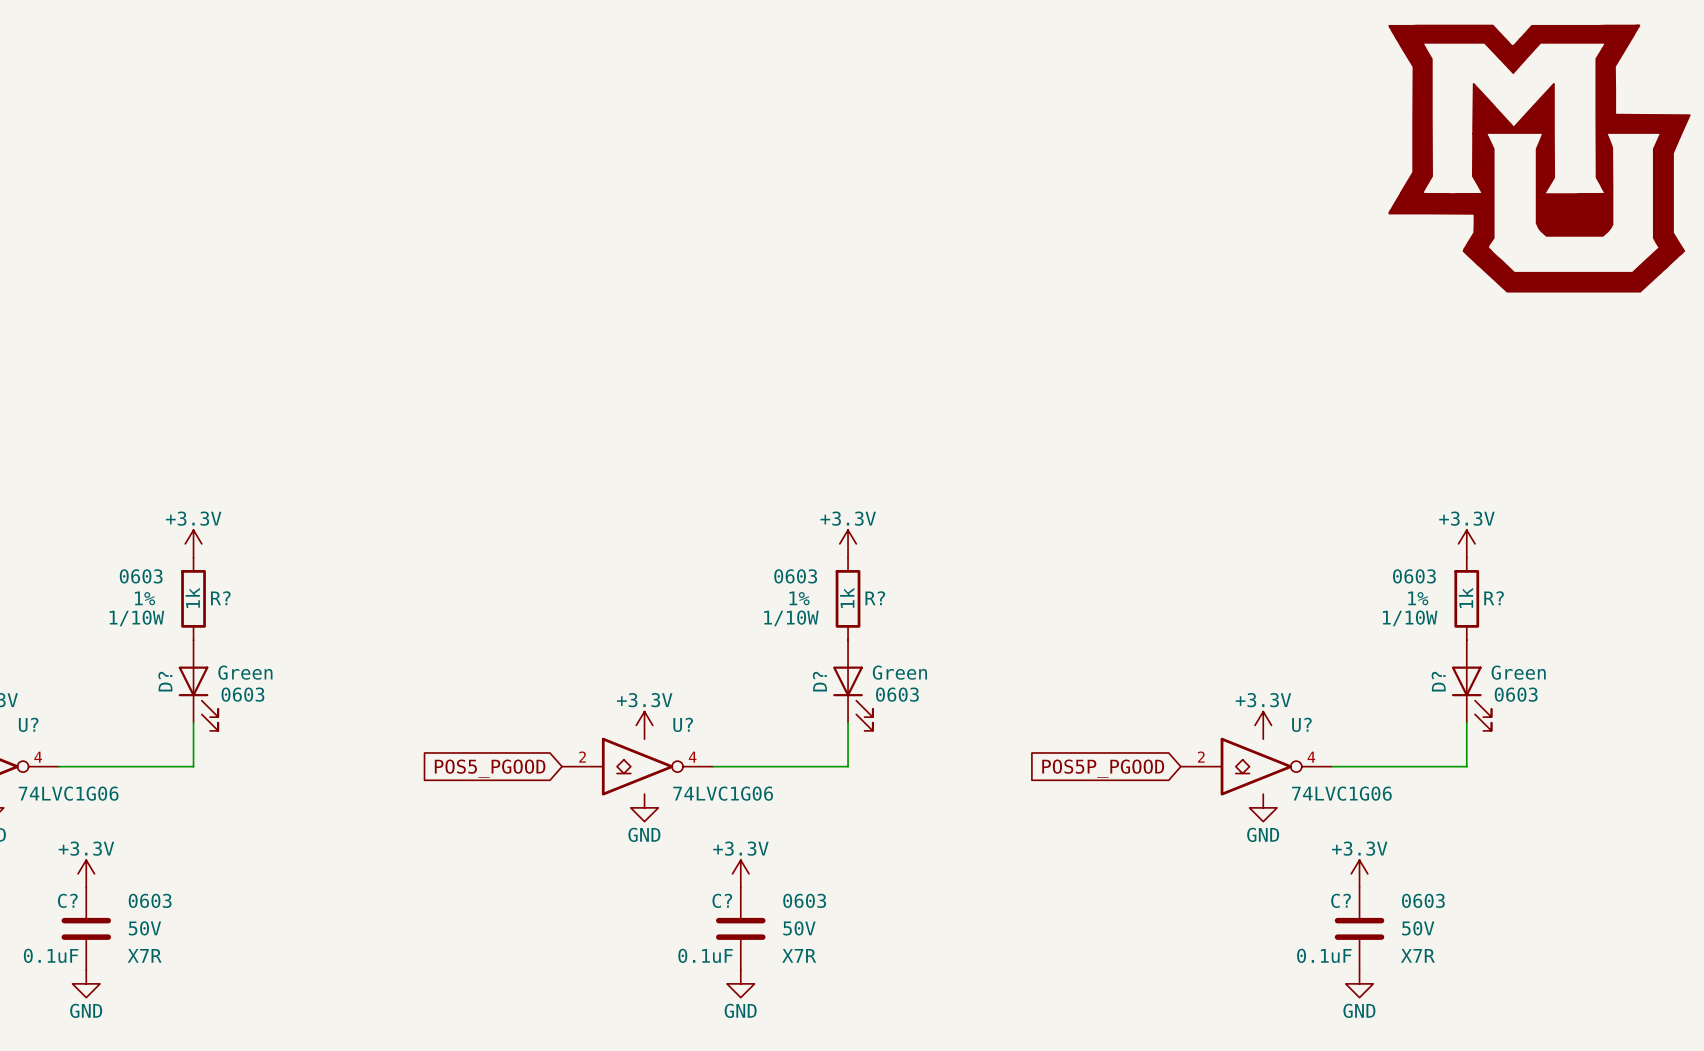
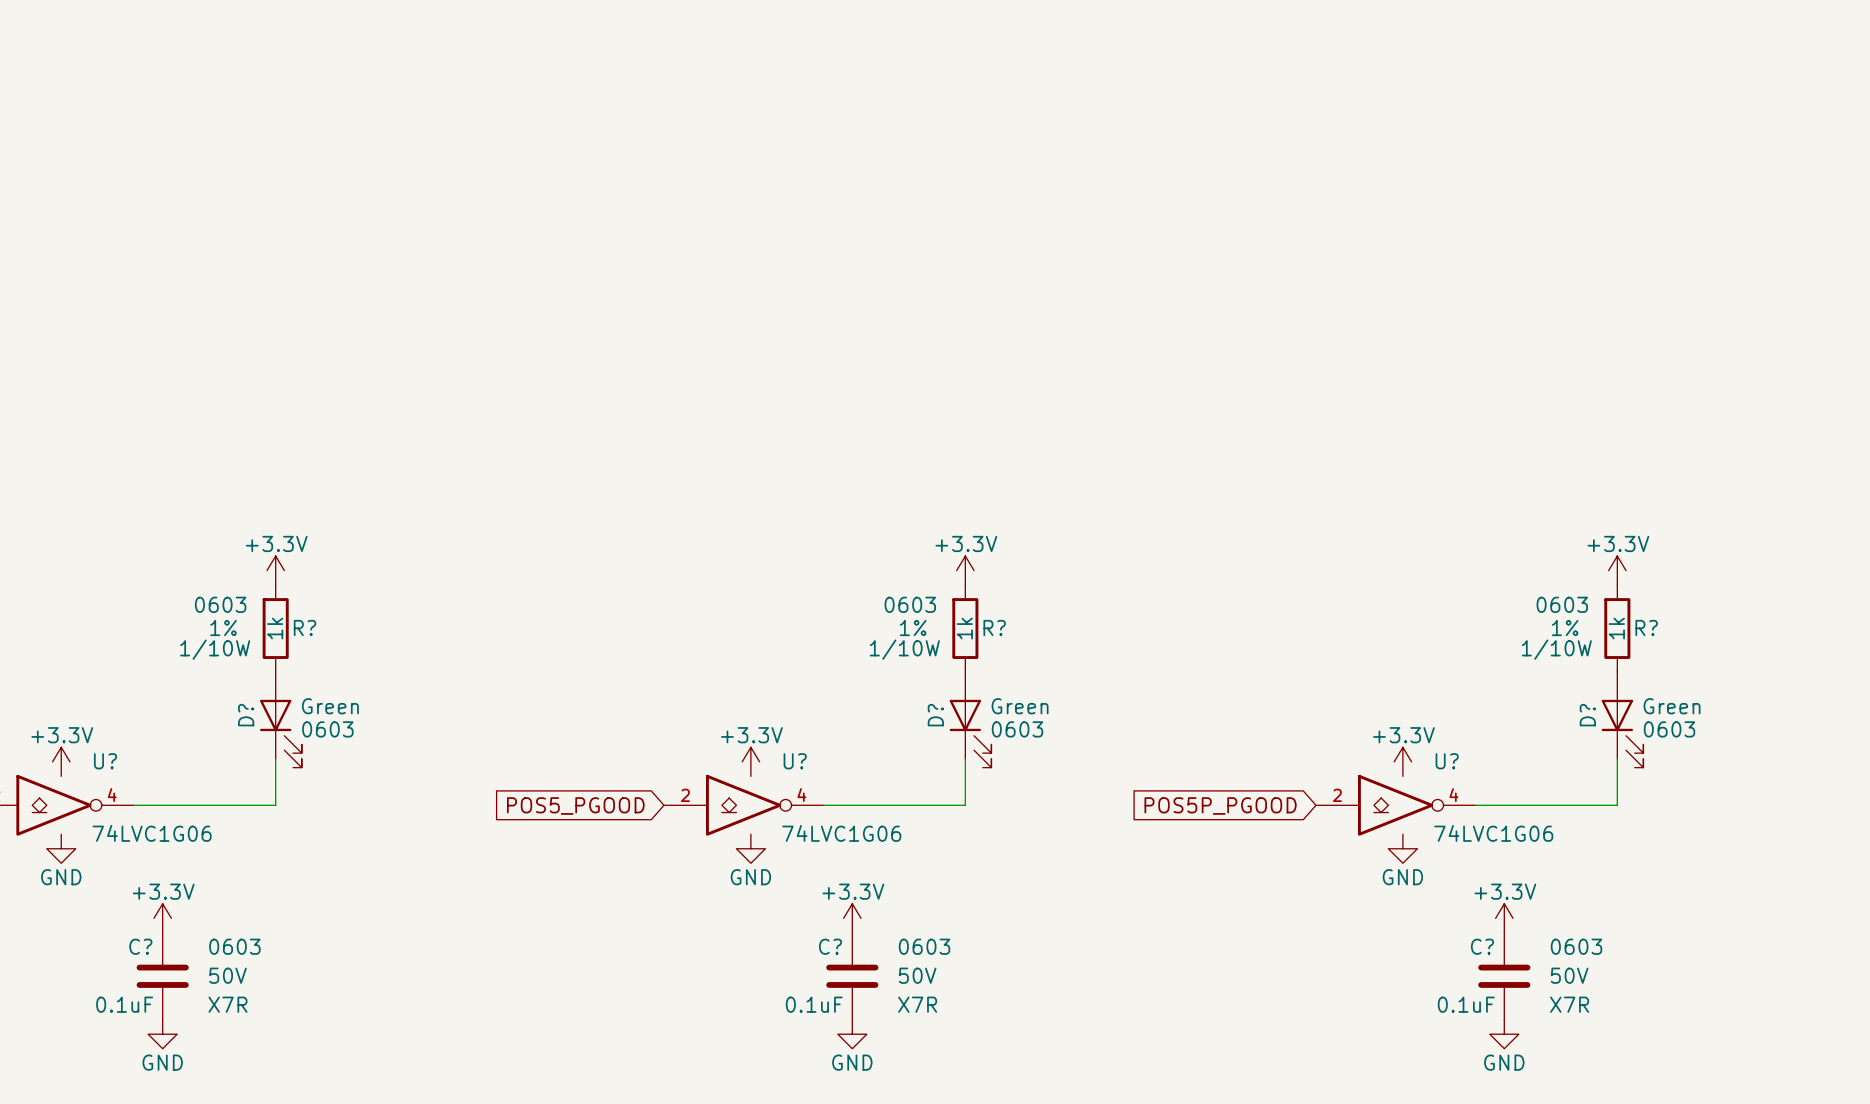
power symbol: (1539, 158) -> none

